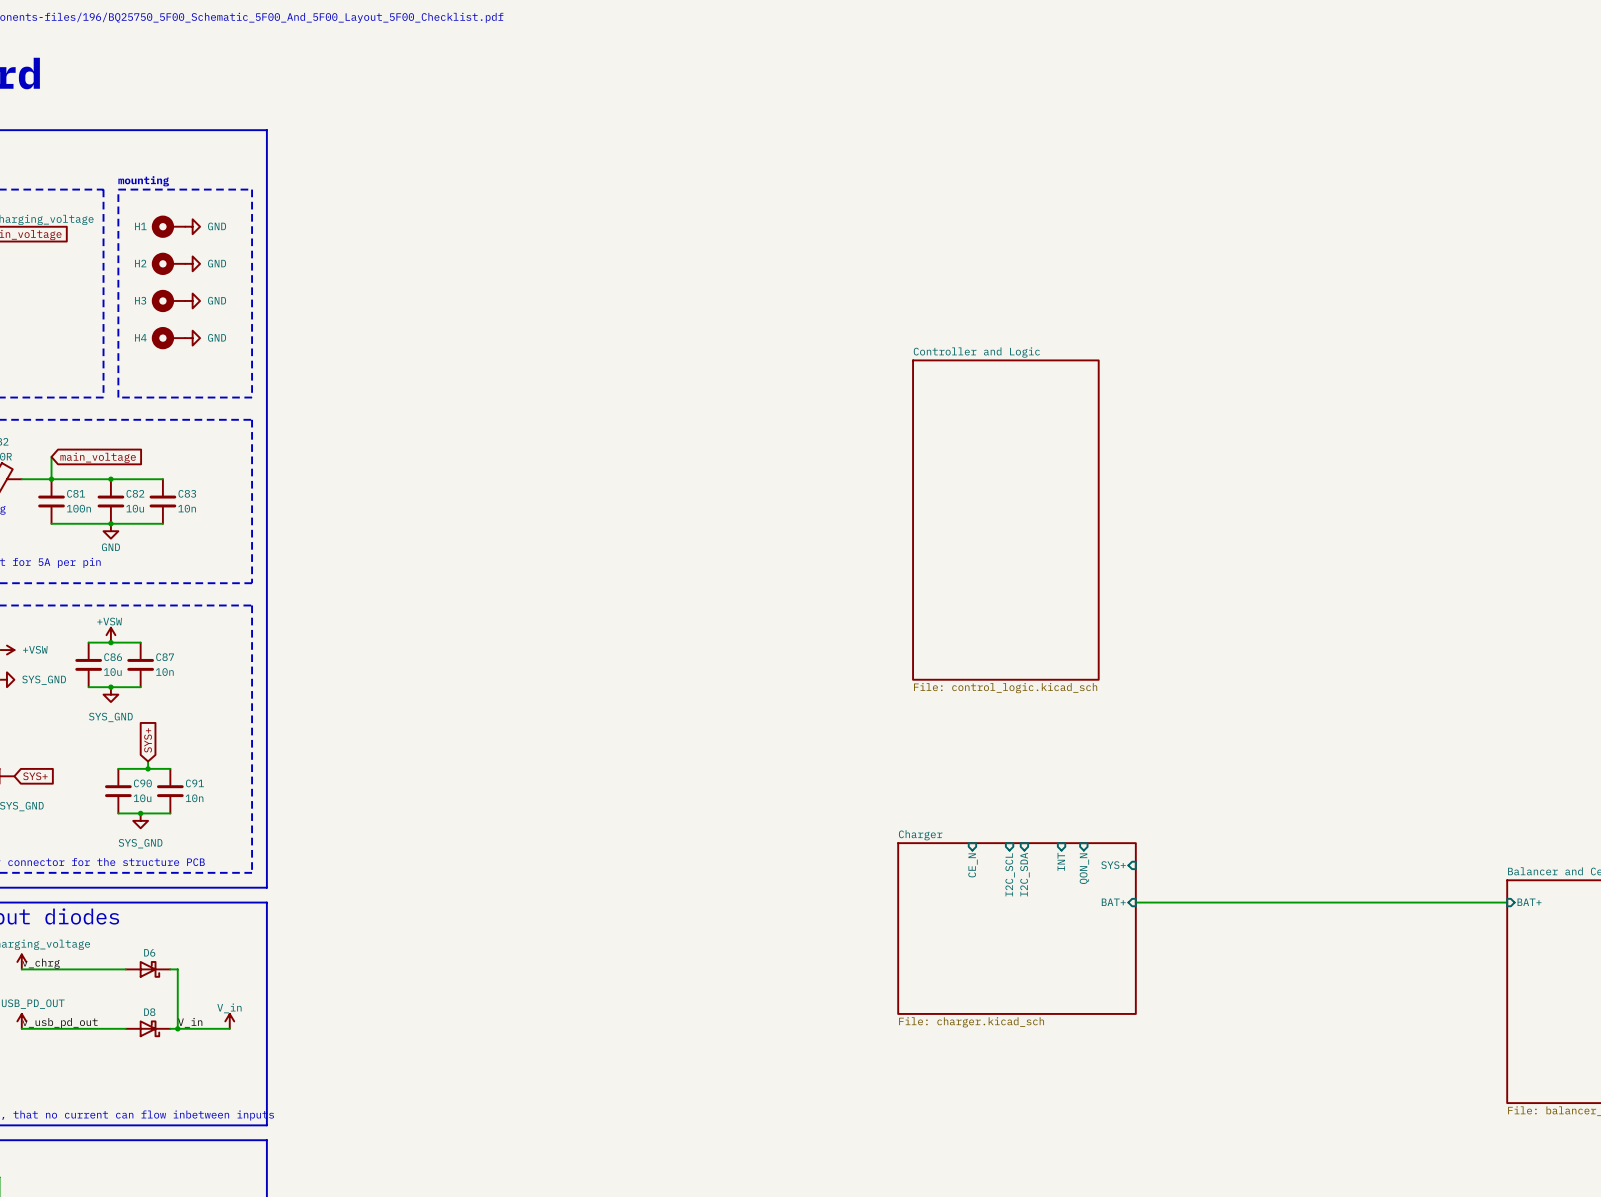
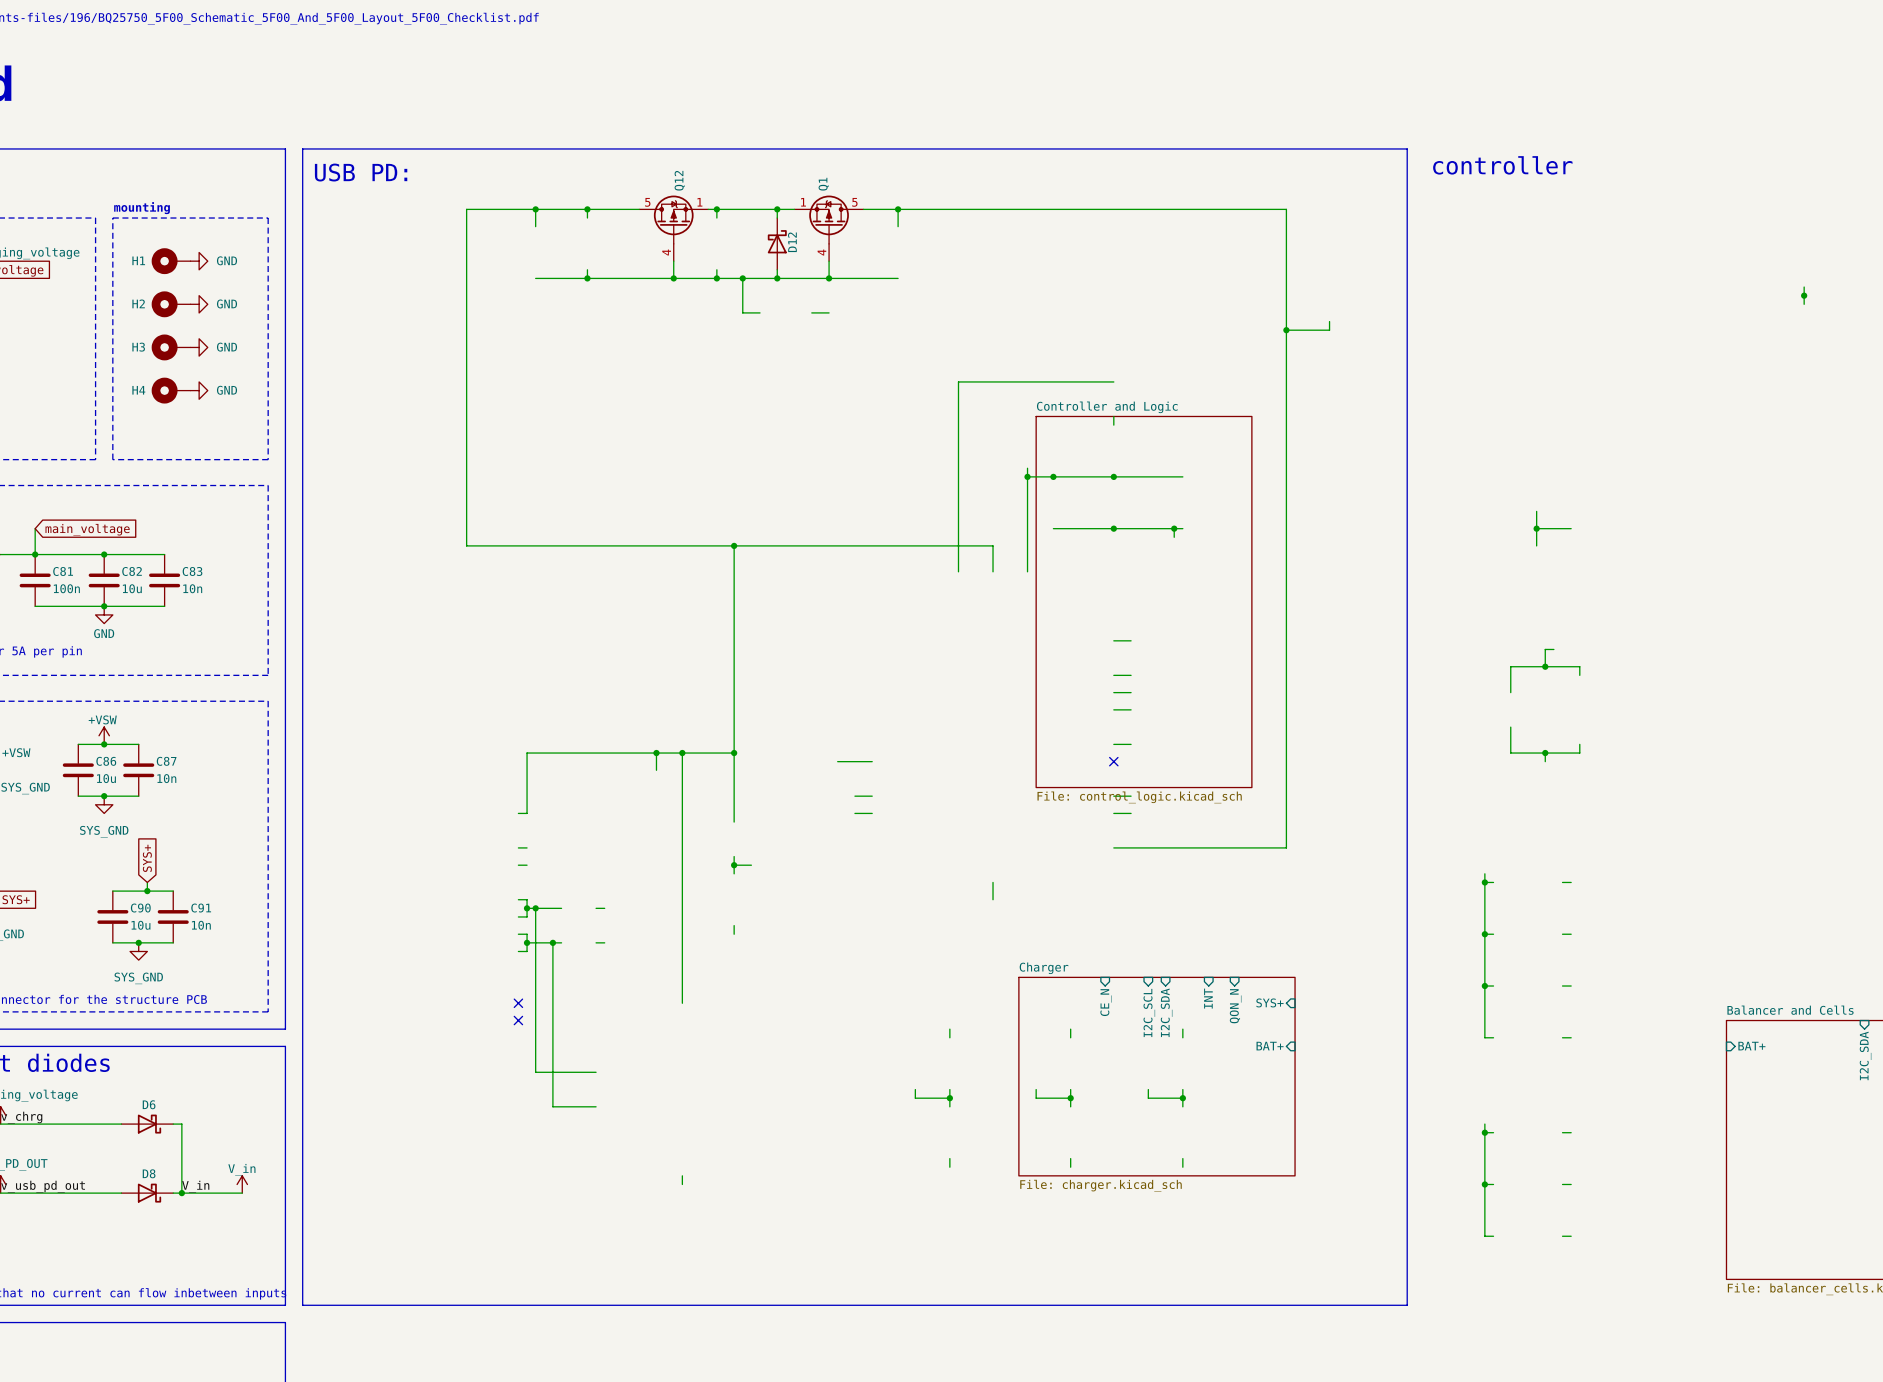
line: none -> (302, 148) (1407, 148) (1407, 1305) (302, 1305) (302, 148)
text: none -> controller (1502, 165)
text: none -> USB PD: (361, 172)
wire: none -> (535, 209) (535, 226)
junction: none -> (535, 209)
wire: none -> (587, 209) (587, 218)
junction: none -> (587, 209)
wire: none -> (639, 209) (466, 209) (466, 545) (993, 545) (993, 571)
wire: none -> (708, 209) (794, 209)
wire: none -> (716, 209) (716, 218)
junction: none -> (716, 209)
wire: none -> (777, 209) (777, 218)
junction: none -> (777, 209)
wire: none -> (863, 209) (1286, 209) (1286, 847) (1113, 847)
wire: none -> (898, 209) (898, 226)
junction: none -> (898, 209)
Q12: none -> (673, 228)
Q1: none -> (829, 228)
D12: none -> (777, 243)
wire: none -> (673, 261) (673, 278)
wire: none -> (829, 261) (829, 278)
wire: none -> (587, 269) (587, 278)
wire: none -> (716, 269) (716, 278)
wire: none -> (777, 269) (777, 278)
wire: none -> (535, 278) (898, 278)
junction: none -> (587, 278)
junction: none -> (673, 278)
junction: none -> (716, 278)
wire: none -> (742, 278) (742, 312) (760, 312)
junction: none -> (742, 278)
junction: none -> (777, 278)
junction: none -> (829, 278)
wire: none -> (1804, 287) (1804, 304)
junction: none -> (1804, 295)
wire: none -> (811, 312) (829, 312)
wire: none -> (1329, 321) (1329, 330) (1286, 330)
junction: none -> (1286, 330)
wire: none -> (1113, 381) (958, 381) (958, 571)
wire: none -> (1113, 416) (1113, 425)
wire: none -> (1027, 468) (1027, 571)
wire: none -> (1027, 476) (1182, 476)
junction: none -> (1027, 476)
junction: none -> (1053, 476)
junction: none -> (1113, 476)
wire: none -> (1536, 511) (1536, 545)
wire: none -> (1053, 528) (1182, 528)
junction: none -> (1113, 528)
wire: none -> (1174, 528) (1174, 537)
junction: none -> (1174, 528)
wire: none -> (1536, 528) (1571, 528)
junction: none -> (1536, 528)
wire: none -> (734, 545) (734, 822)
junction: none -> (734, 545)
wire: none -> (1113, 640) (1131, 640)
wire: none -> (1553, 649) (1545, 649) (1545, 666)
junction: none -> (1545, 666)
wire: none -> (1113, 675) (1131, 675)
wire: none -> (1579, 675) (1579, 666) (1510, 666) (1510, 692)
wire: none -> (1113, 692) (1131, 692)
wire: none -> (1113, 709) (1131, 709)
wire: none -> (1510, 727) (1510, 753) (1579, 753) (1579, 744)
wire: none -> (1113, 744) (1131, 744)
wire: none -> (656, 753) (656, 770)
junction: none -> (656, 753)
wire: none -> (682, 753) (682, 1003)
junction: none -> (682, 753)
wire: none -> (734, 753) (527, 753) (527, 813) (518, 813)
junction: none -> (734, 753)
wire: none -> (1545, 753) (1545, 761)
junction: none -> (1545, 753)
wire: none -> (837, 761) (872, 761)
no-connect mark: none -> (1113, 761)
wire: none -> (854, 796) (872, 796)
wire: none -> (1113, 796) (1131, 796)
wire: none -> (854, 813) (872, 813)
wire: none -> (1113, 813) (1131, 813)
wire: none -> (518, 847) (527, 847)
wire: none -> (734, 856) (734, 873)
wire: none -> (518, 865) (527, 865)
wire: none -> (734, 865) (751, 865)
junction: none -> (734, 865)
wire: none -> (1484, 873) (1484, 1037) (1493, 1037)
wire: none -> (993, 882) (993, 899)
wire: none -> (1484, 882) (1493, 882)
junction: none -> (1484, 882)
wire: none -> (1562, 882) (1571, 882)
wire: none -> (518, 899) (527, 899) (527, 916) (518, 916)
wire: none -> (527, 908) (561, 908)
junction: none -> (527, 908)
wire: none -> (535, 908) (535, 1072) (596, 1072)
junction: none -> (535, 908)
wire: none -> (596, 908) (604, 908)
wire: none -> (734, 925) (734, 934)
wire: none -> (518, 934) (527, 934) (527, 951) (518, 951)
wire: none -> (1484, 934) (1493, 934)
junction: none -> (1484, 934)
wire: none -> (1562, 934) (1571, 934)
wire: none -> (527, 942) (561, 942)
junction: none -> (527, 942)
wire: none -> (552, 942) (552, 1106) (596, 1106)
junction: none -> (552, 942)
wire: none -> (596, 942) (604, 942)
wire: none -> (1484, 986) (1493, 986)
junction: none -> (1484, 986)
wire: none -> (1562, 986) (1571, 986)
no-connect mark: none -> (518, 1003)
no-connect mark: none -> (518, 1020)
wire: none -> (949, 1029) (949, 1037)
wire: none -> (1070, 1029) (1070, 1037)
wire: none -> (1182, 1029) (1182, 1037)
wire: none -> (1562, 1037) (1571, 1037)
wire: (1135, 902) (1507, 902) -> none
wire: none -> (915, 1089) (915, 1098) (949, 1098)
wire: none -> (949, 1089) (949, 1106)
wire: none -> (1036, 1089) (1036, 1098) (1070, 1098)
wire: none -> (1070, 1089) (1070, 1106)
wire: none -> (1148, 1089) (1148, 1098) (1182, 1098)
wire: none -> (1182, 1089) (1182, 1106)
junction: none -> (949, 1098)
junction: none -> (1070, 1098)
junction: none -> (1182, 1098)
wire: none -> (1484, 1124) (1484, 1236) (1493, 1236)
wire: none -> (1484, 1132) (1493, 1132)
junction: none -> (1484, 1132)
wire: none -> (1562, 1132) (1571, 1132)
wire: none -> (949, 1158) (949, 1167)
wire: none -> (1070, 1158) (1070, 1167)
wire: none -> (1182, 1158) (1182, 1167)
wire: none -> (682, 1175) (682, 1184)
wire: none -> (1484, 1184) (1493, 1184)
junction: none -> (1484, 1184)
wire: none -> (1562, 1184) (1571, 1184)
wire: none -> (1562, 1236) (1571, 1236)

